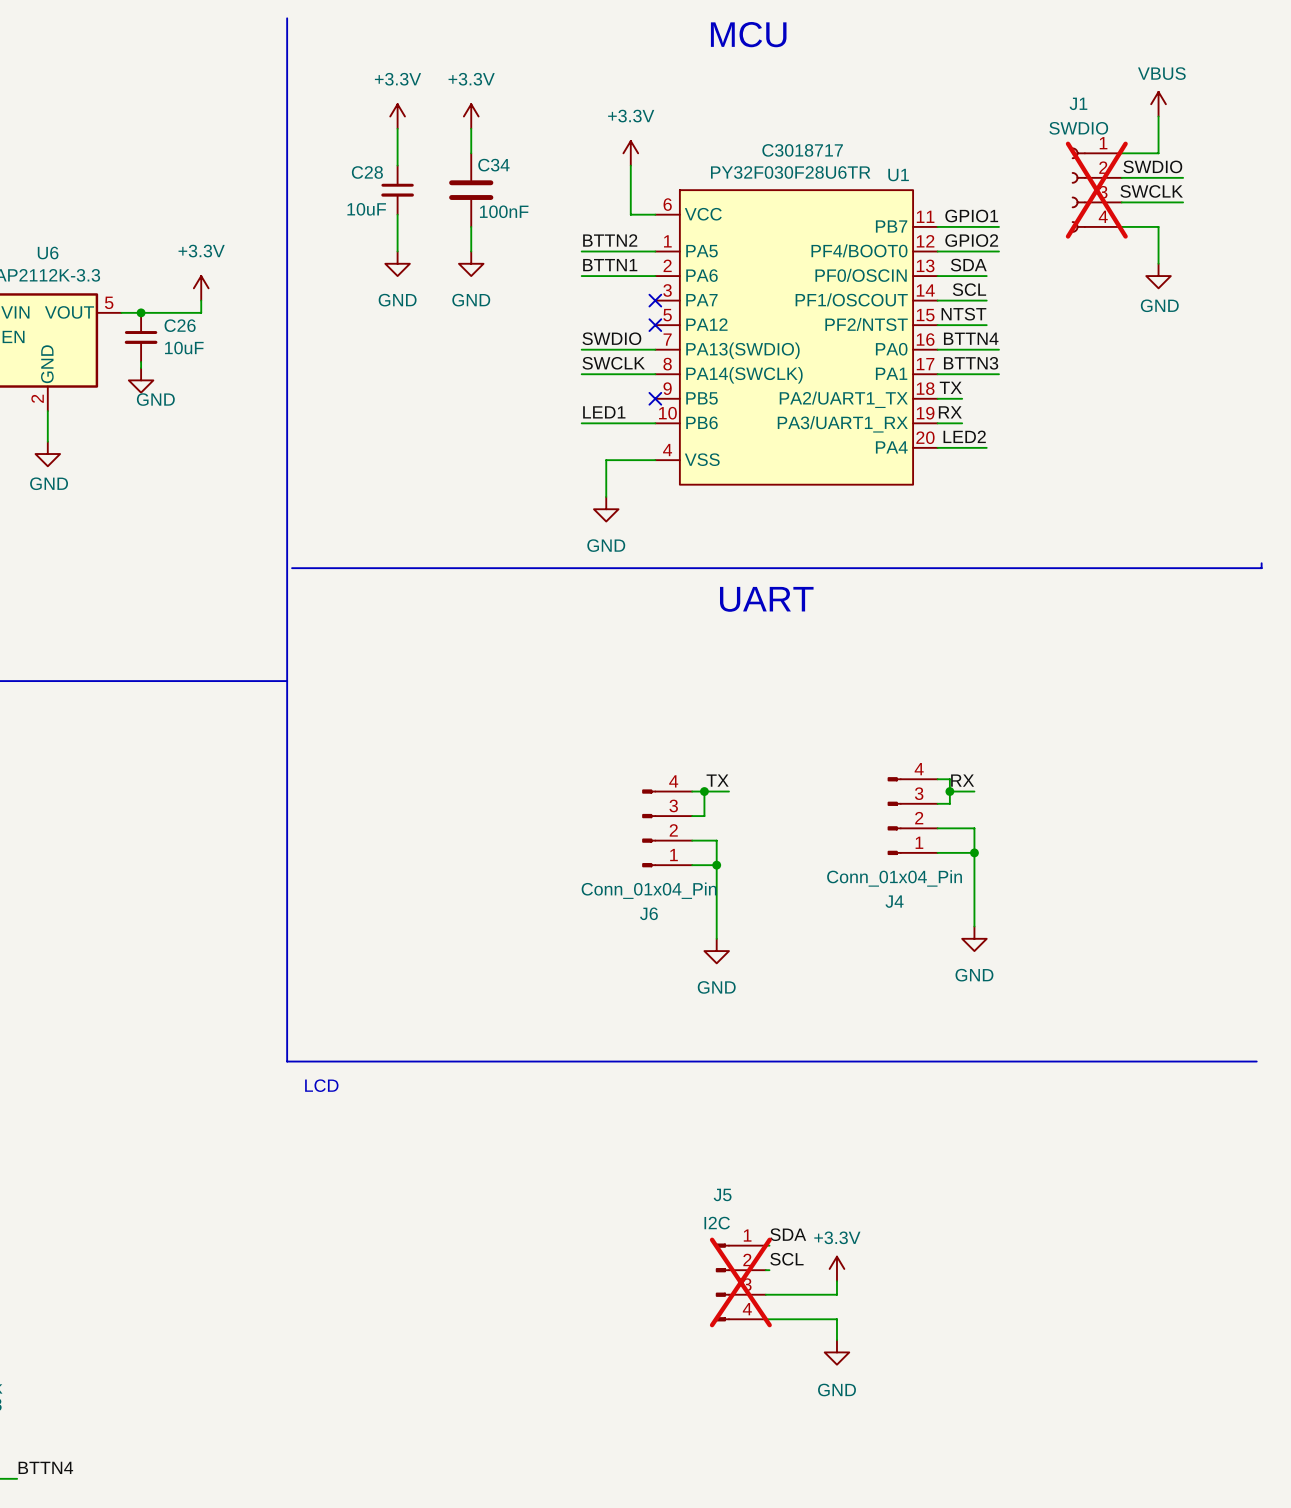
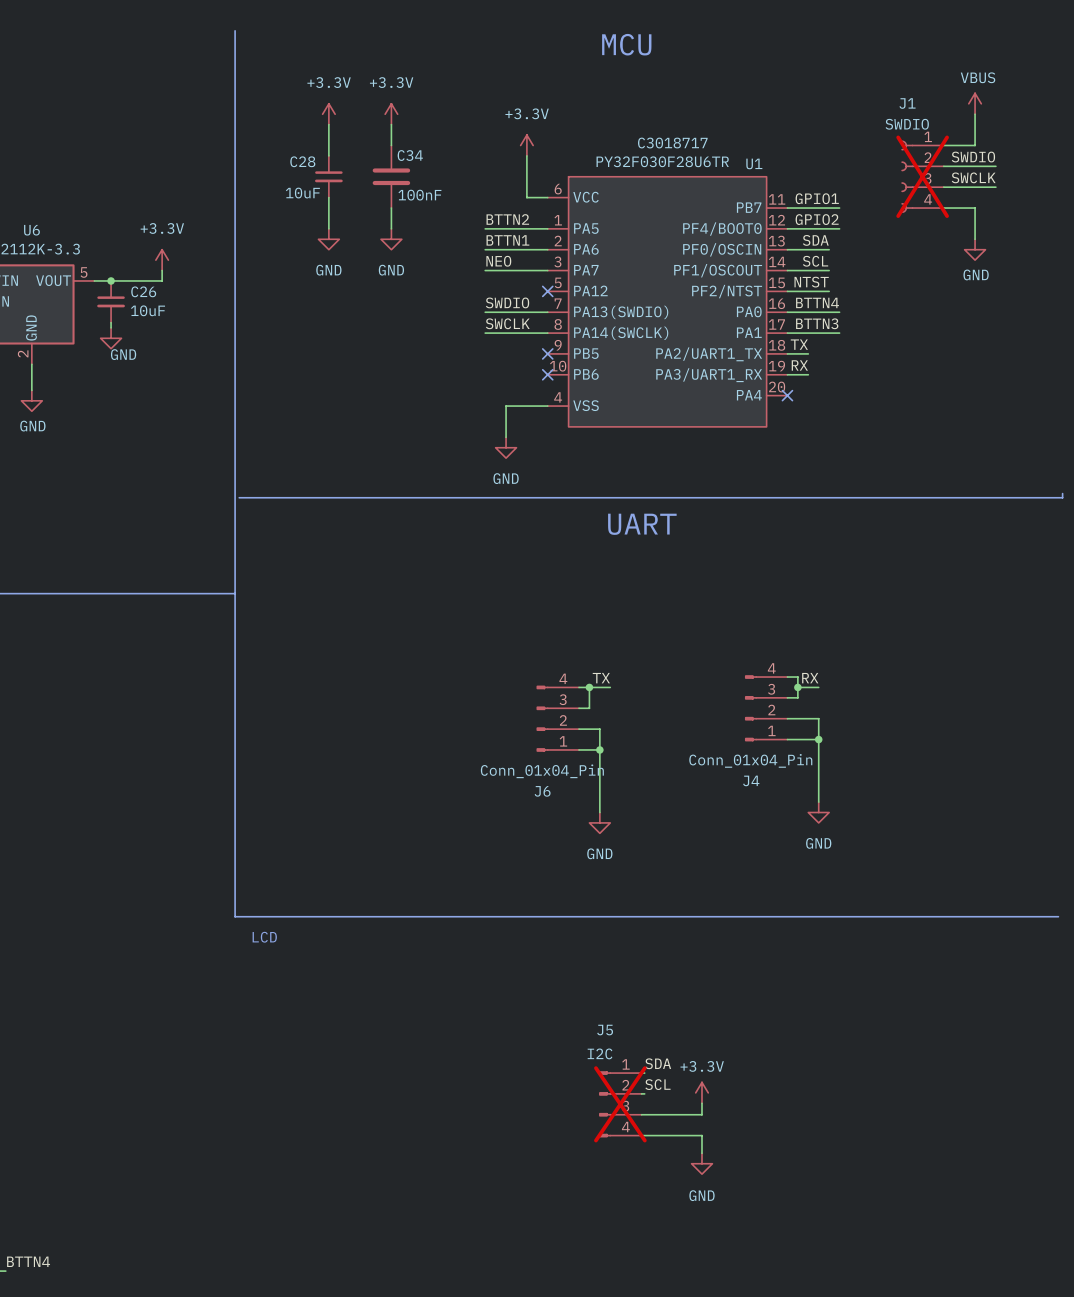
label: none -> NEO (498, 261)
no-connect mark: (655, 300) -> none
label: LED1 (604, 412) -> none
wire: (581, 423) (655, 423) -> (485, 270) (547, 270)
no-connect mark: none -> (547, 374)
label: LED2 (964, 436) -> none
wire: (937, 447) (986, 447) -> none
no-connect mark: none -> (787, 395)

